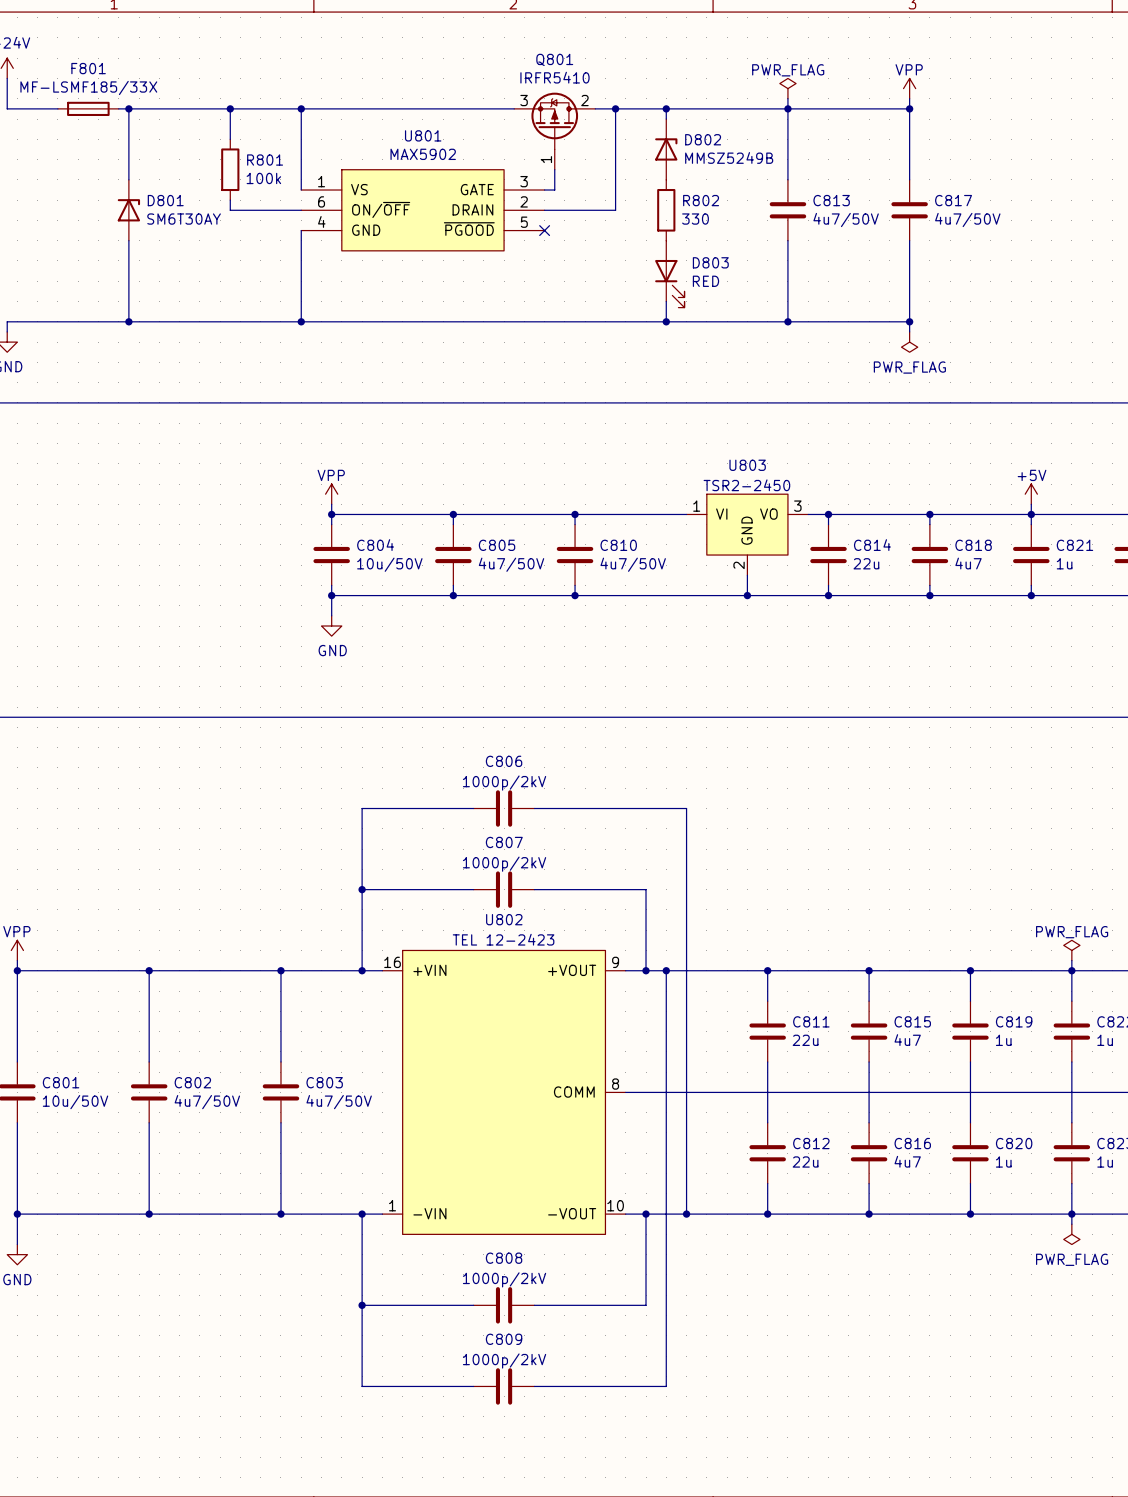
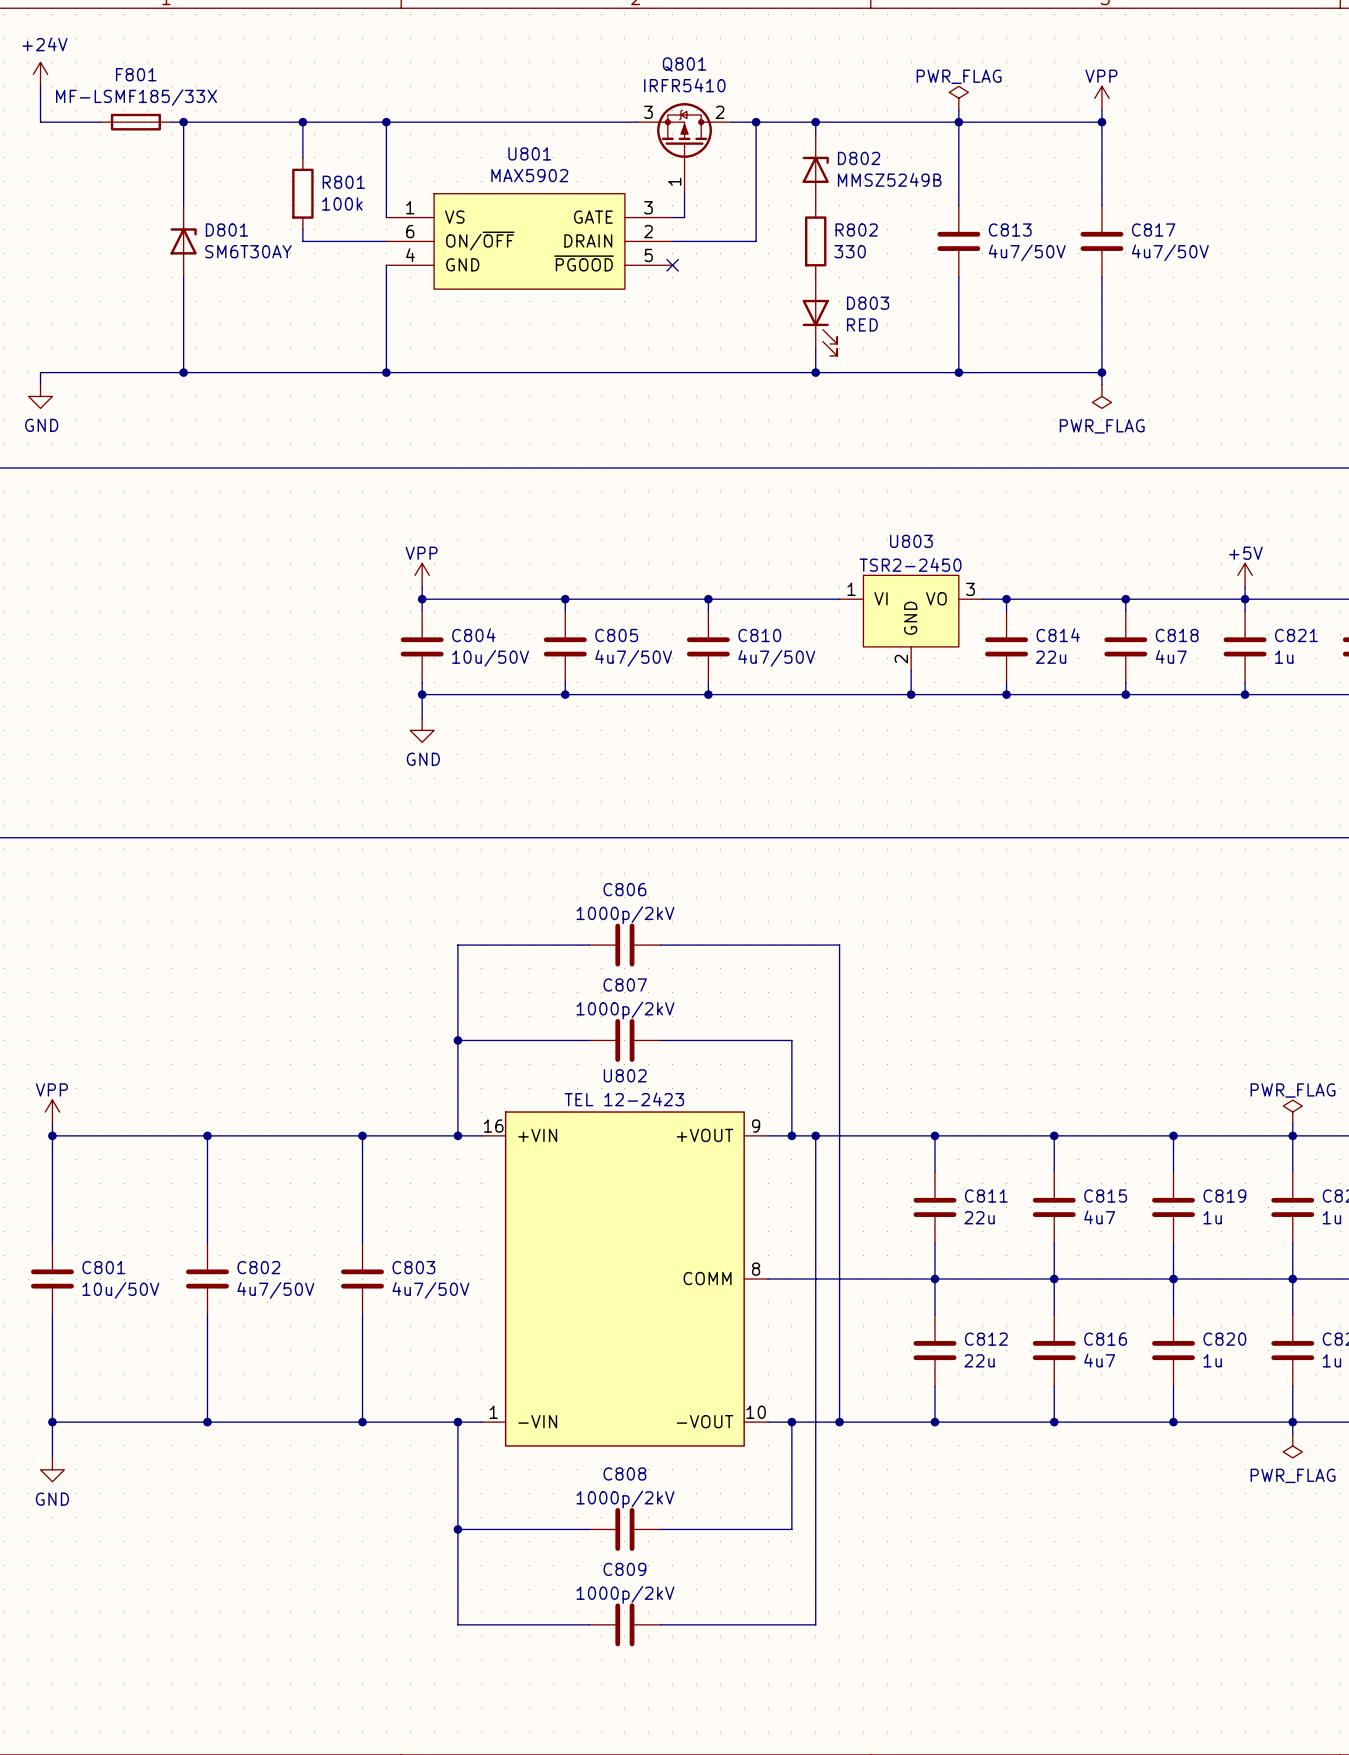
junction: none -> (934, 1279)
junction: none -> (1054, 1279)
junction: none -> (1173, 1279)
junction: none -> (1292, 1279)

